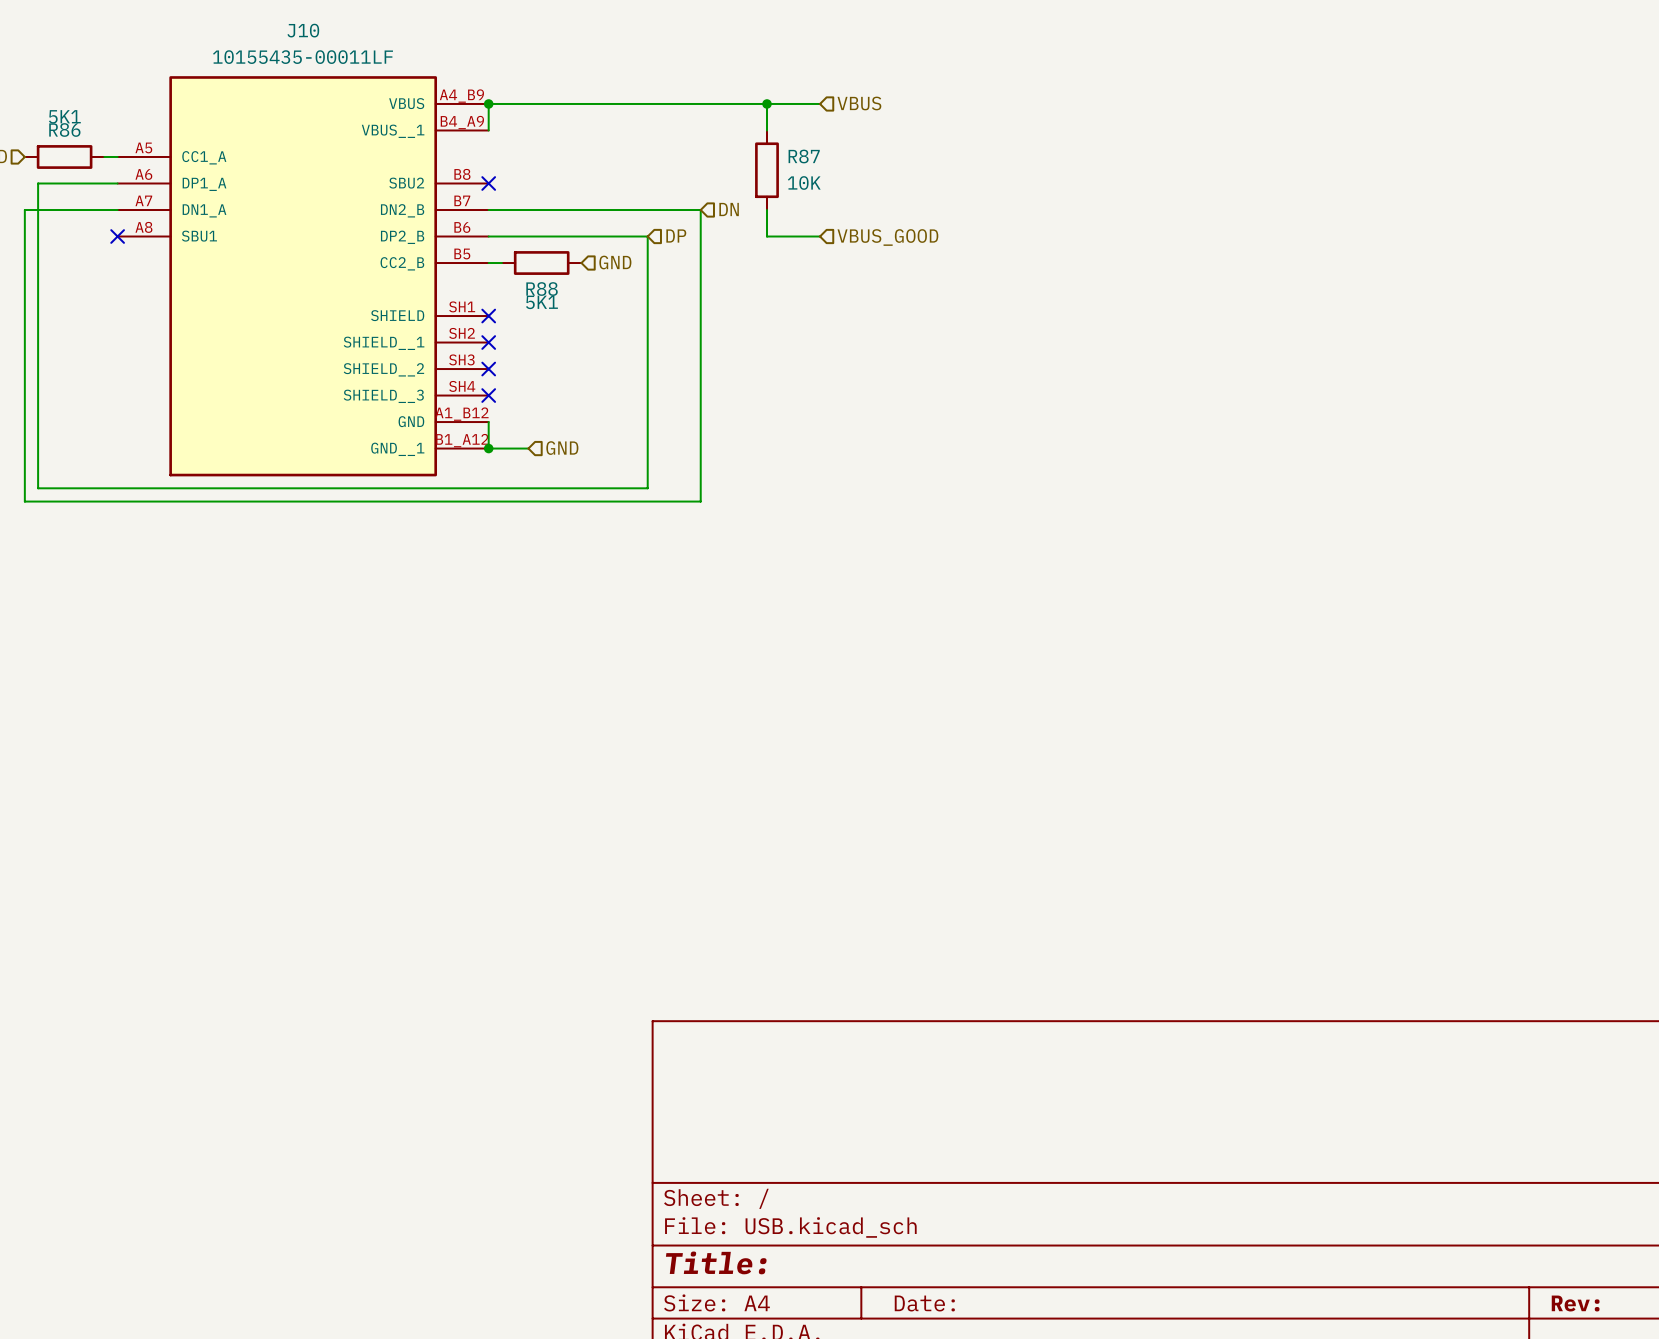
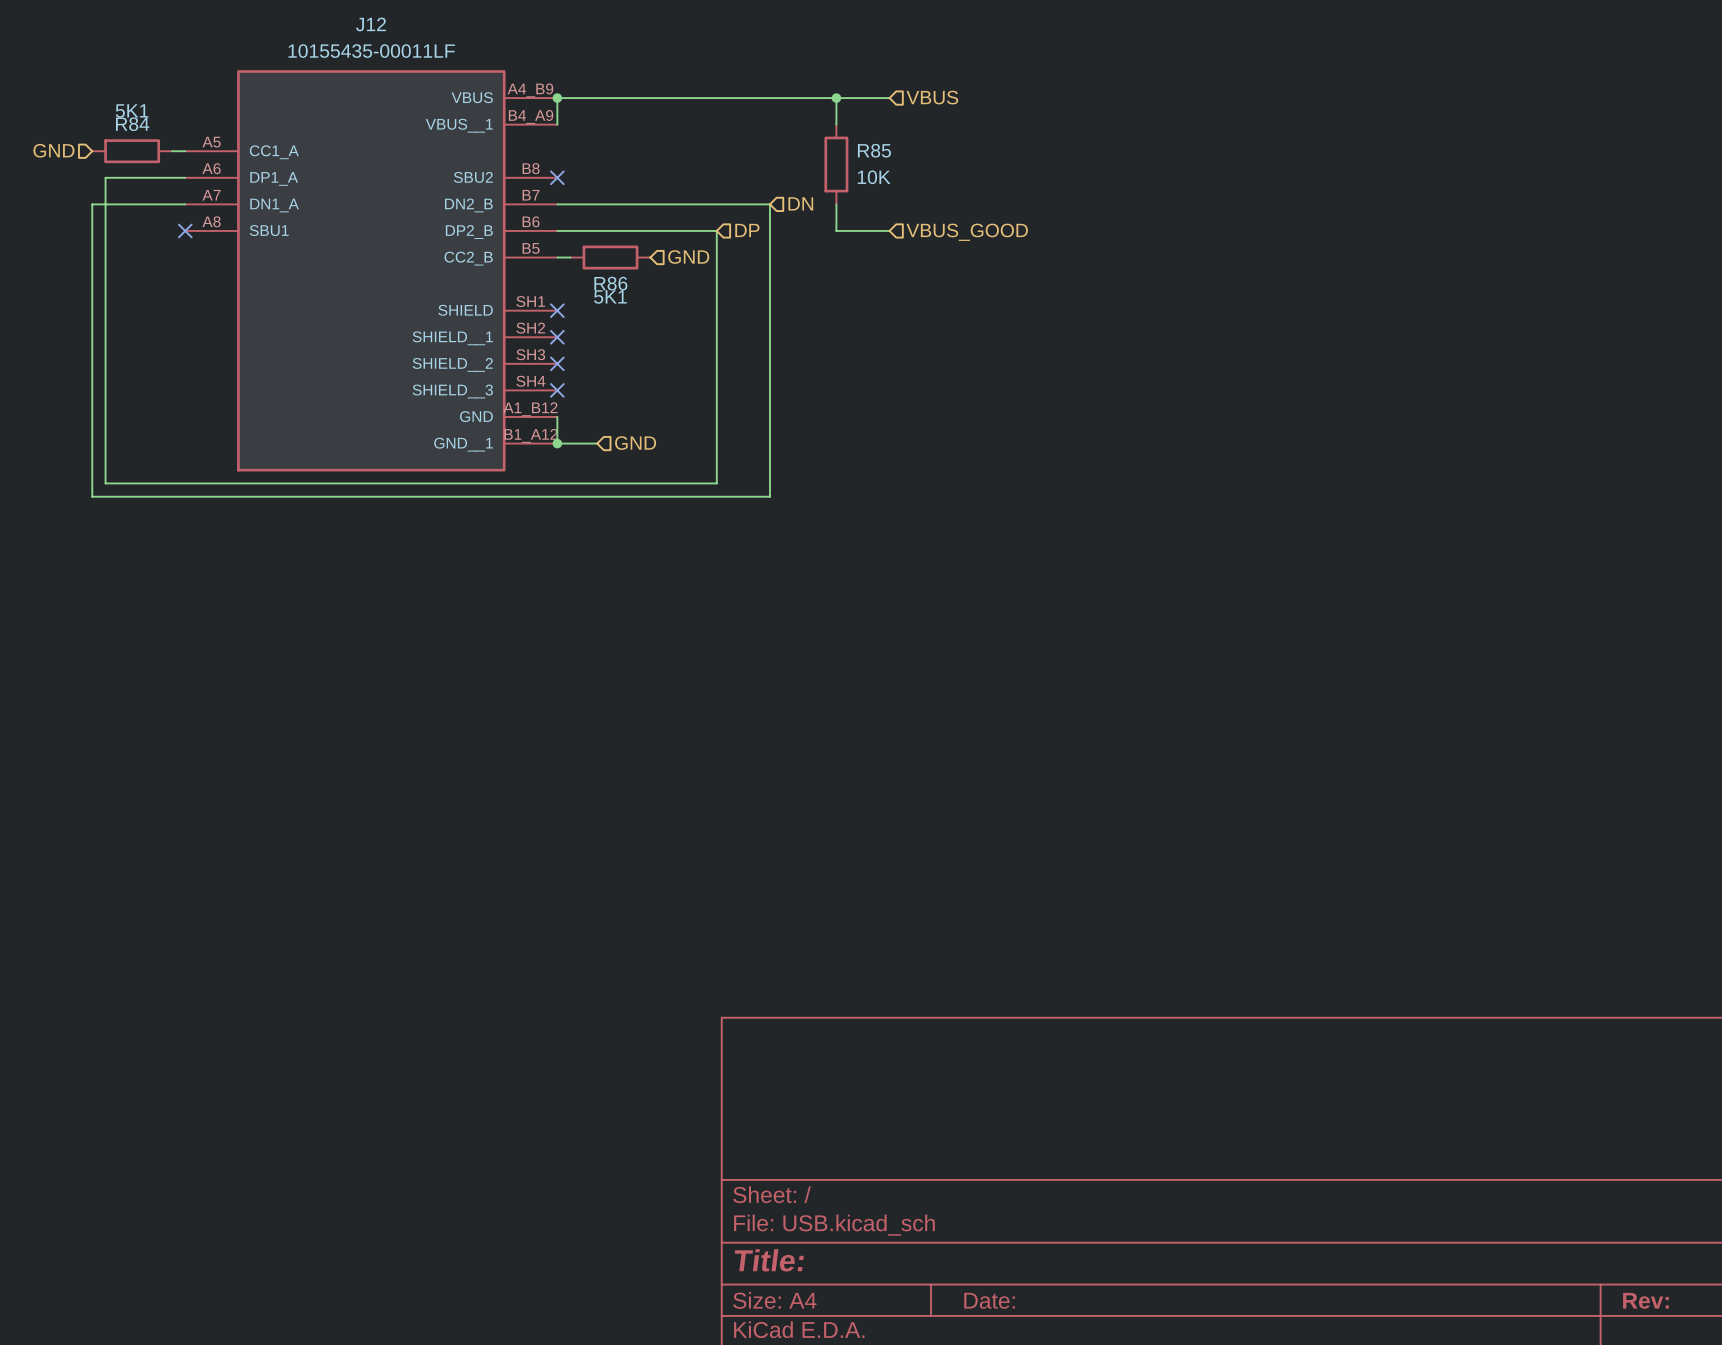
J10 name: J10 (303, 30) -> J12 (370, 24)
R86 name: R86 (64, 129) -> R84 (132, 124)
R87 name: R87 (804, 156) -> R85 (874, 150)
R88 name: R88 (542, 289) -> R86 (610, 283)

